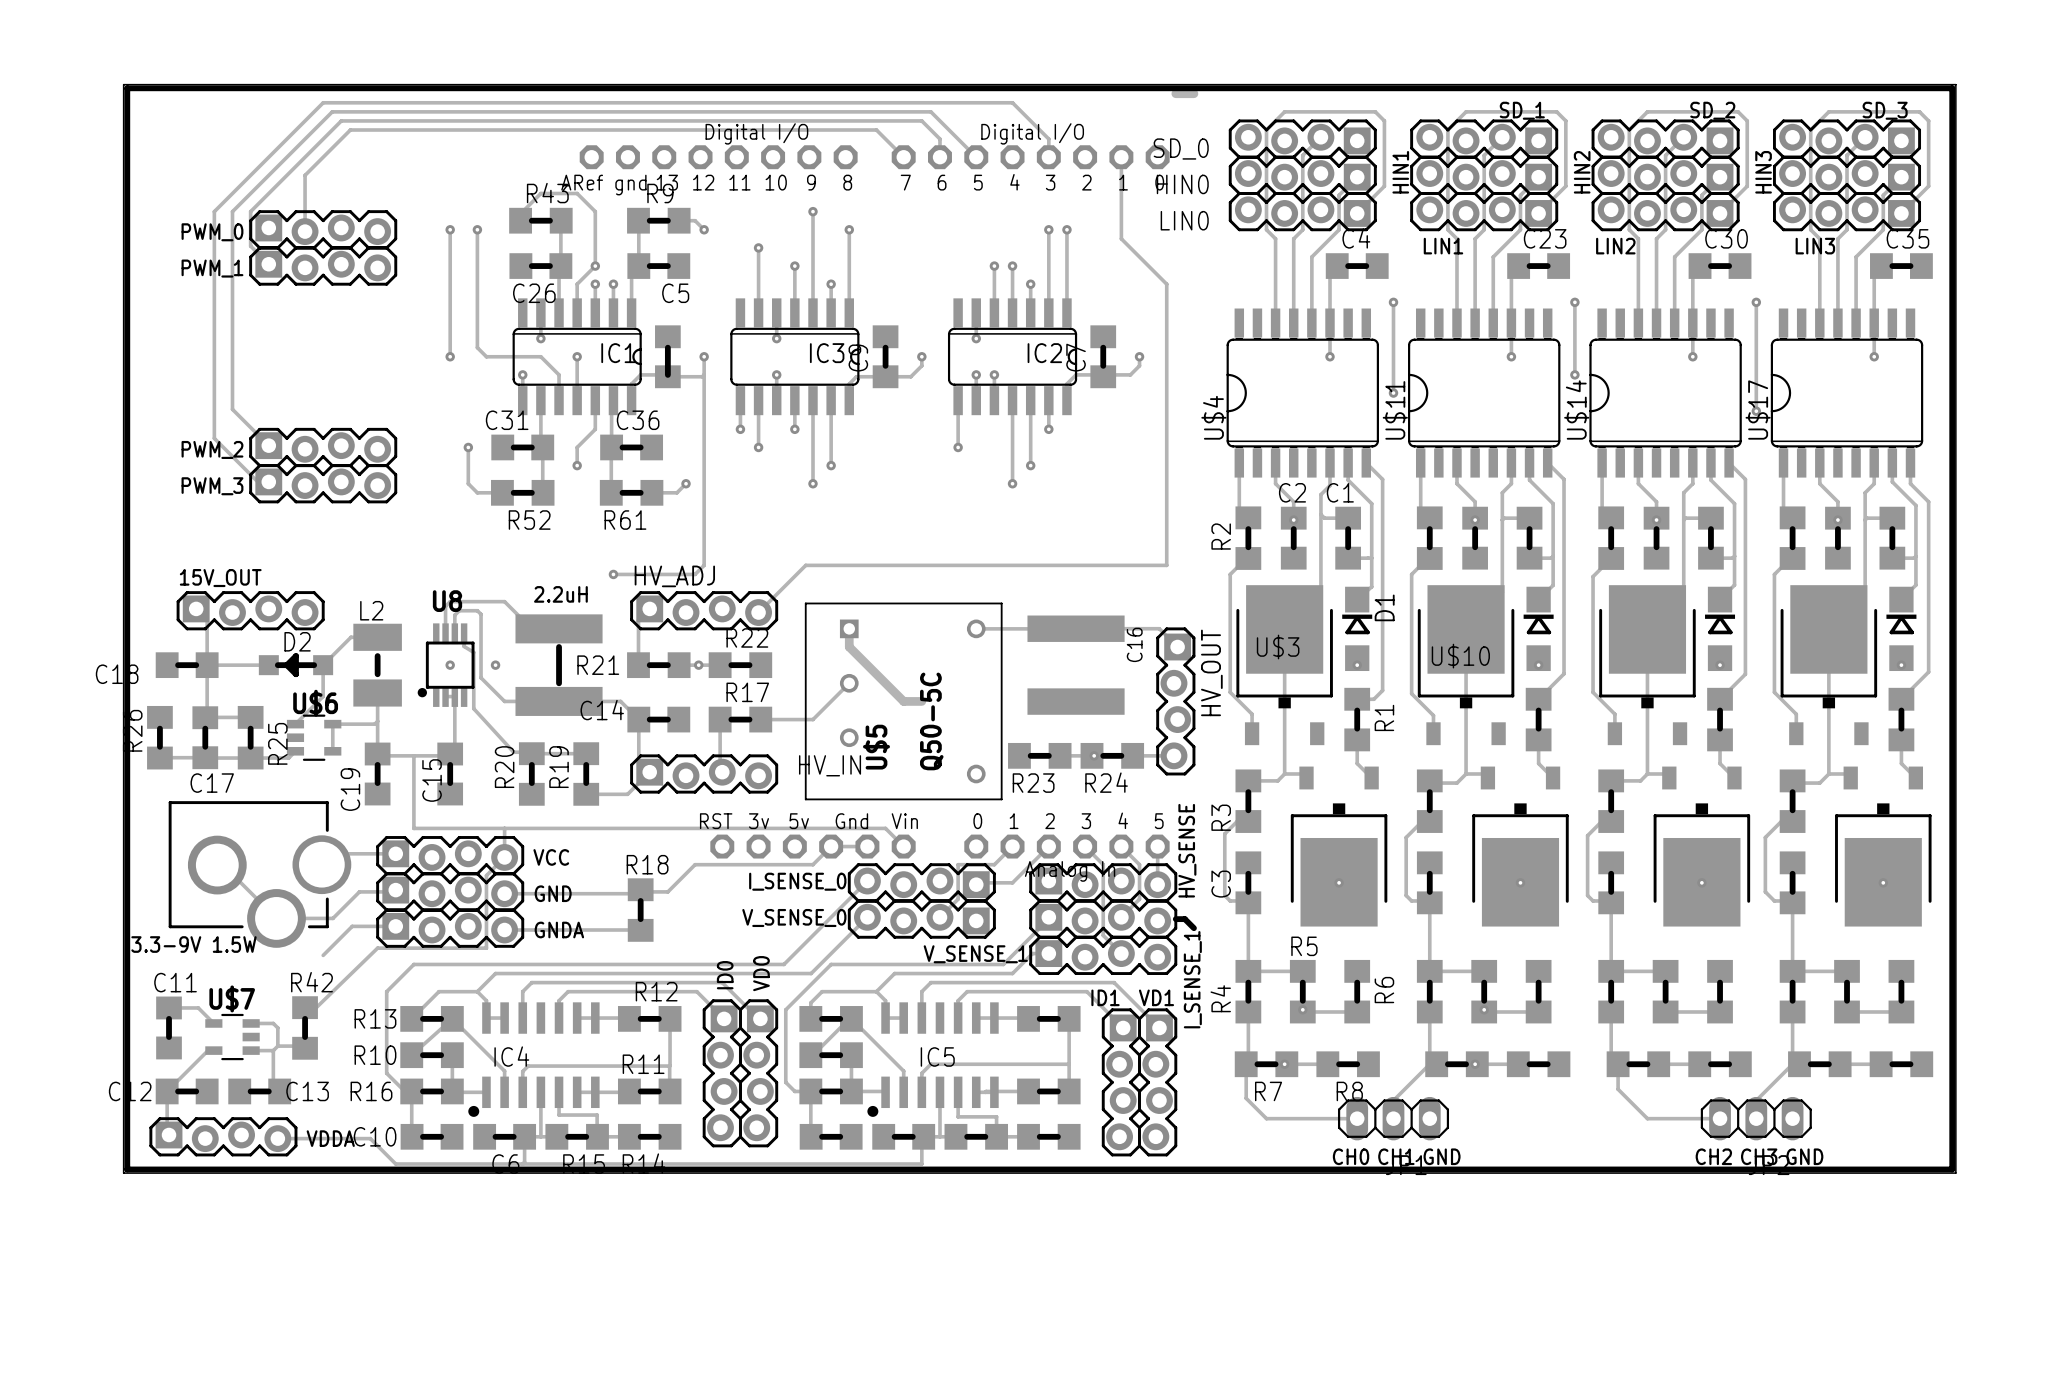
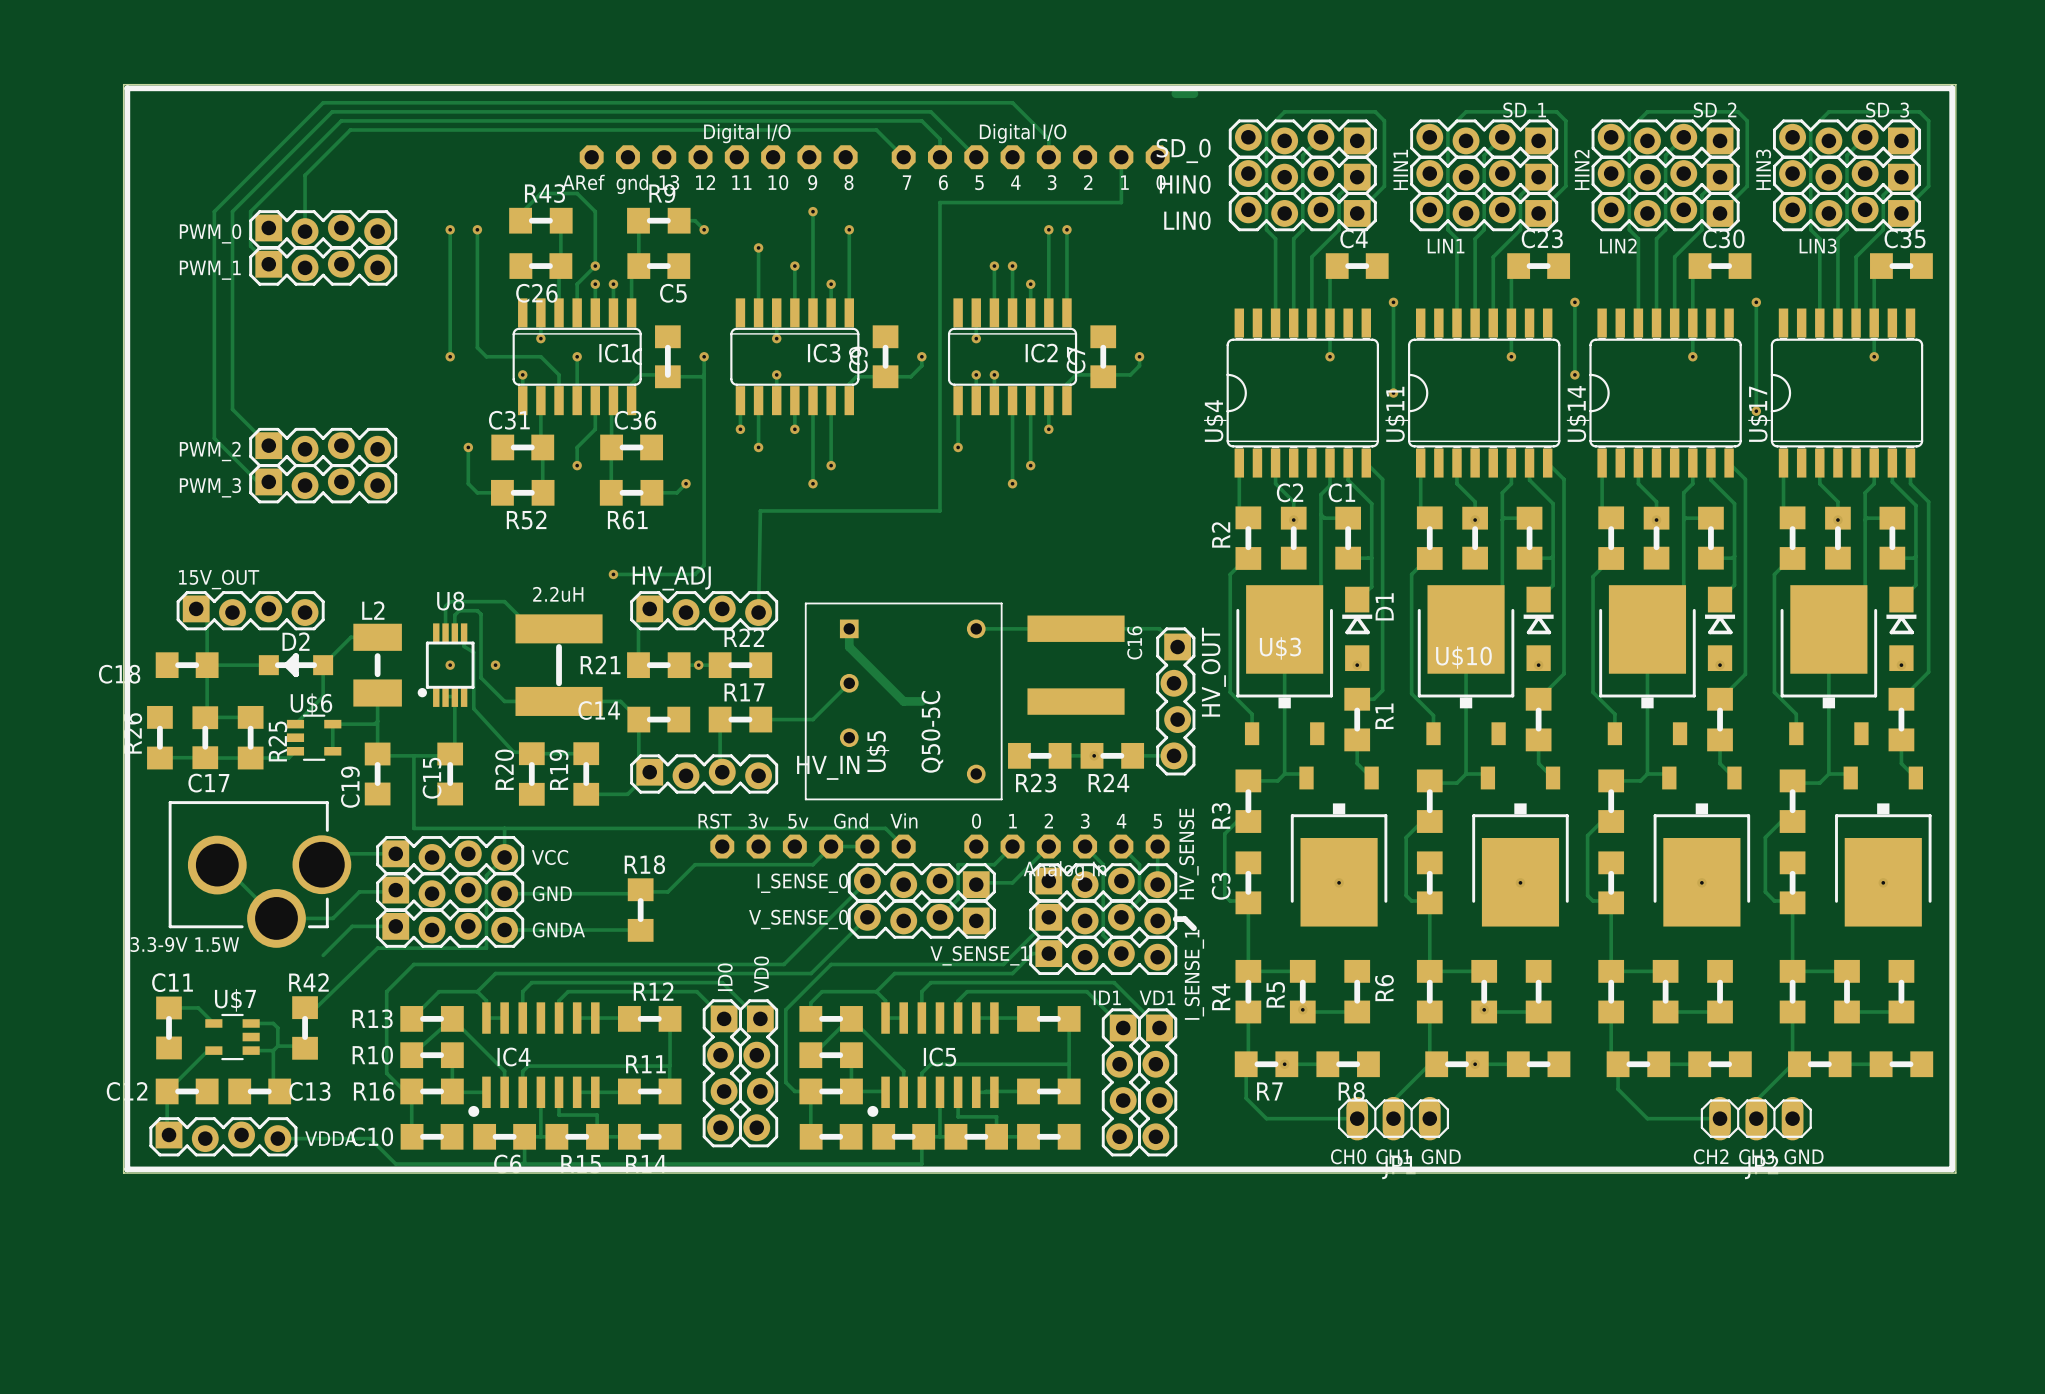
track: (1121, 202) (1121, 238) (1166, 284) (1166, 565) (805, 565) (758, 612) -> (1121, 202) (939, 202) (939, 510) (760, 510) (758, 612)
R5 name rotation: 0° (1304, 946) -> 90° counterclockwise (1275, 994)
R5 name position: R5 (1304, 946) -> R5 (1275, 994)

